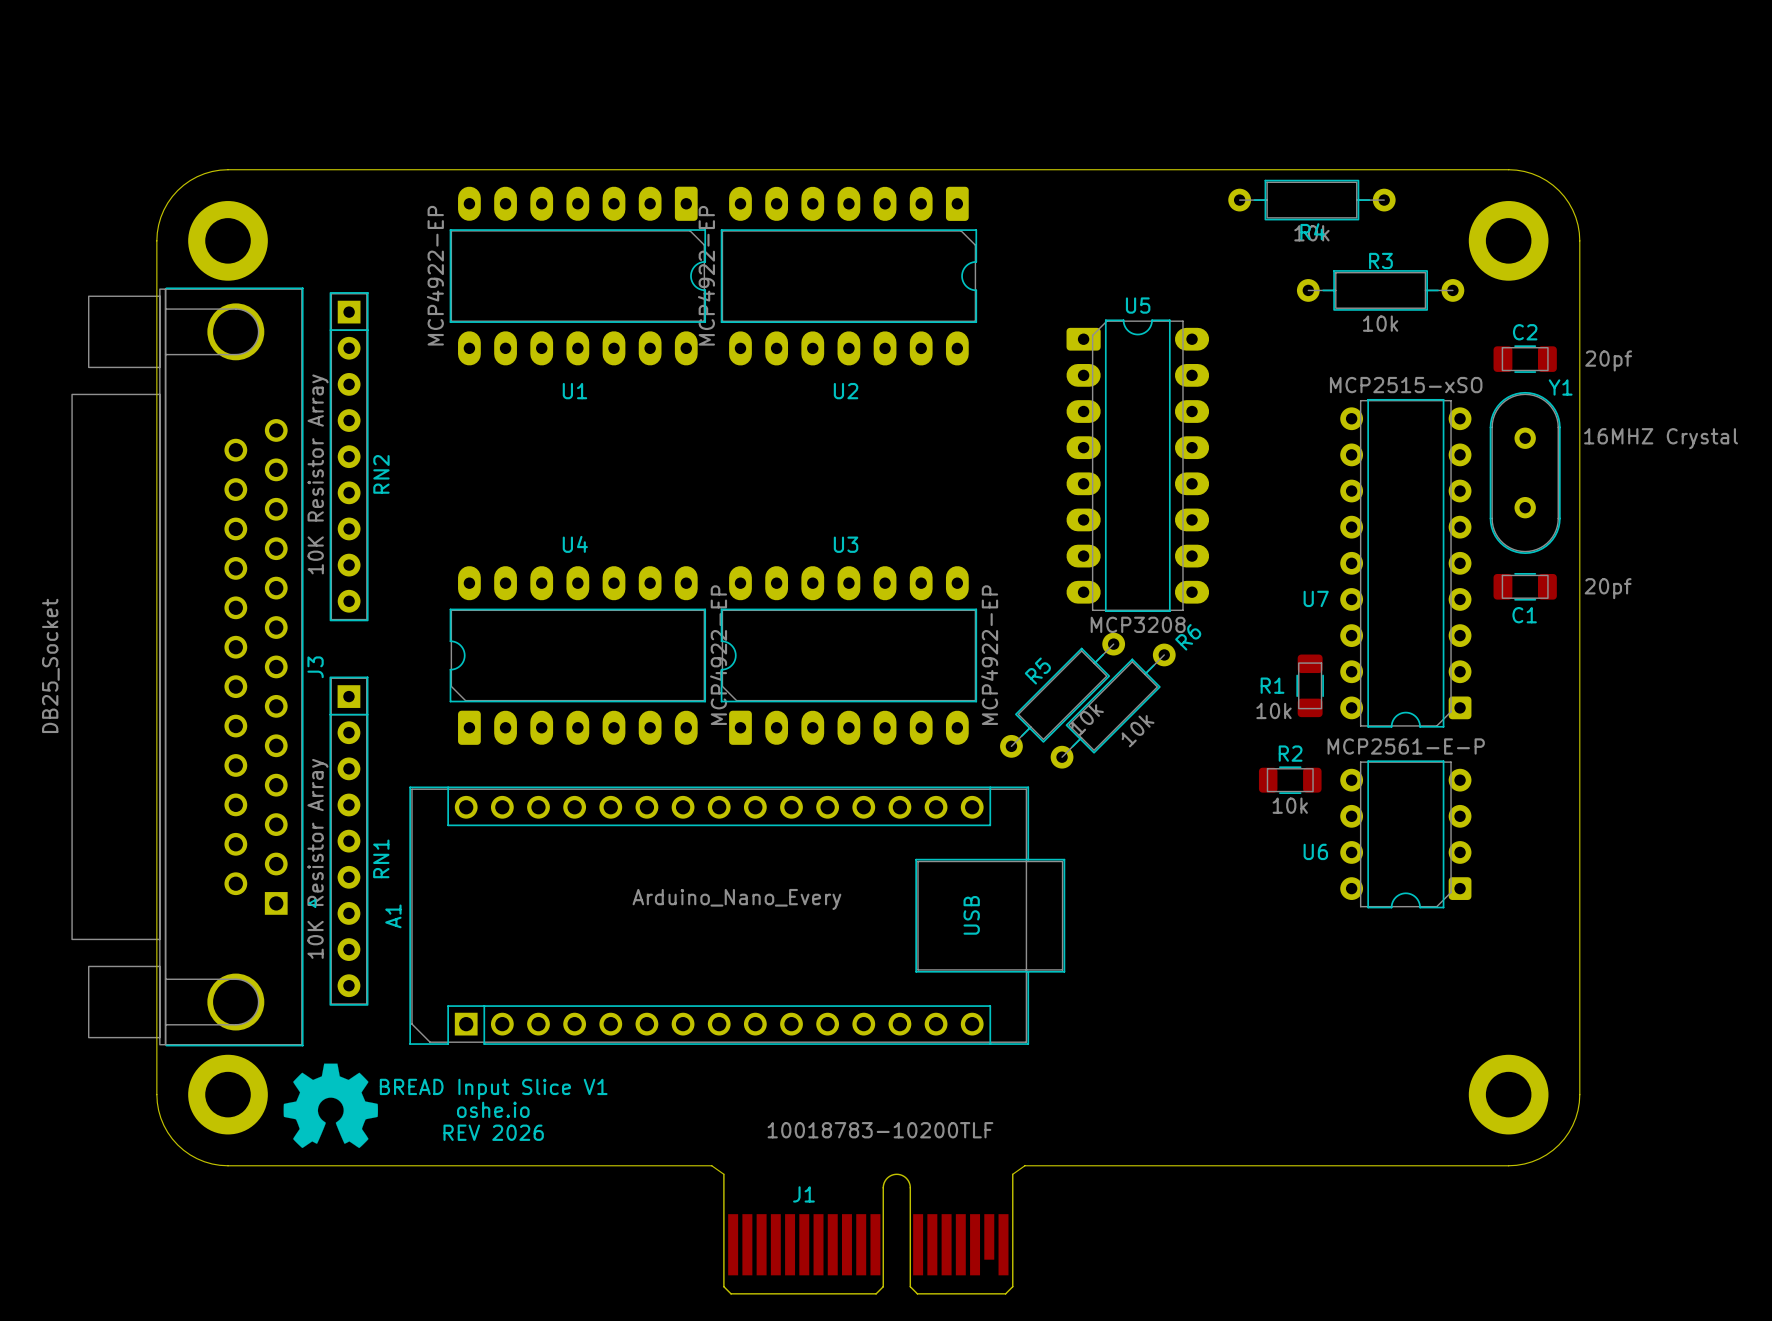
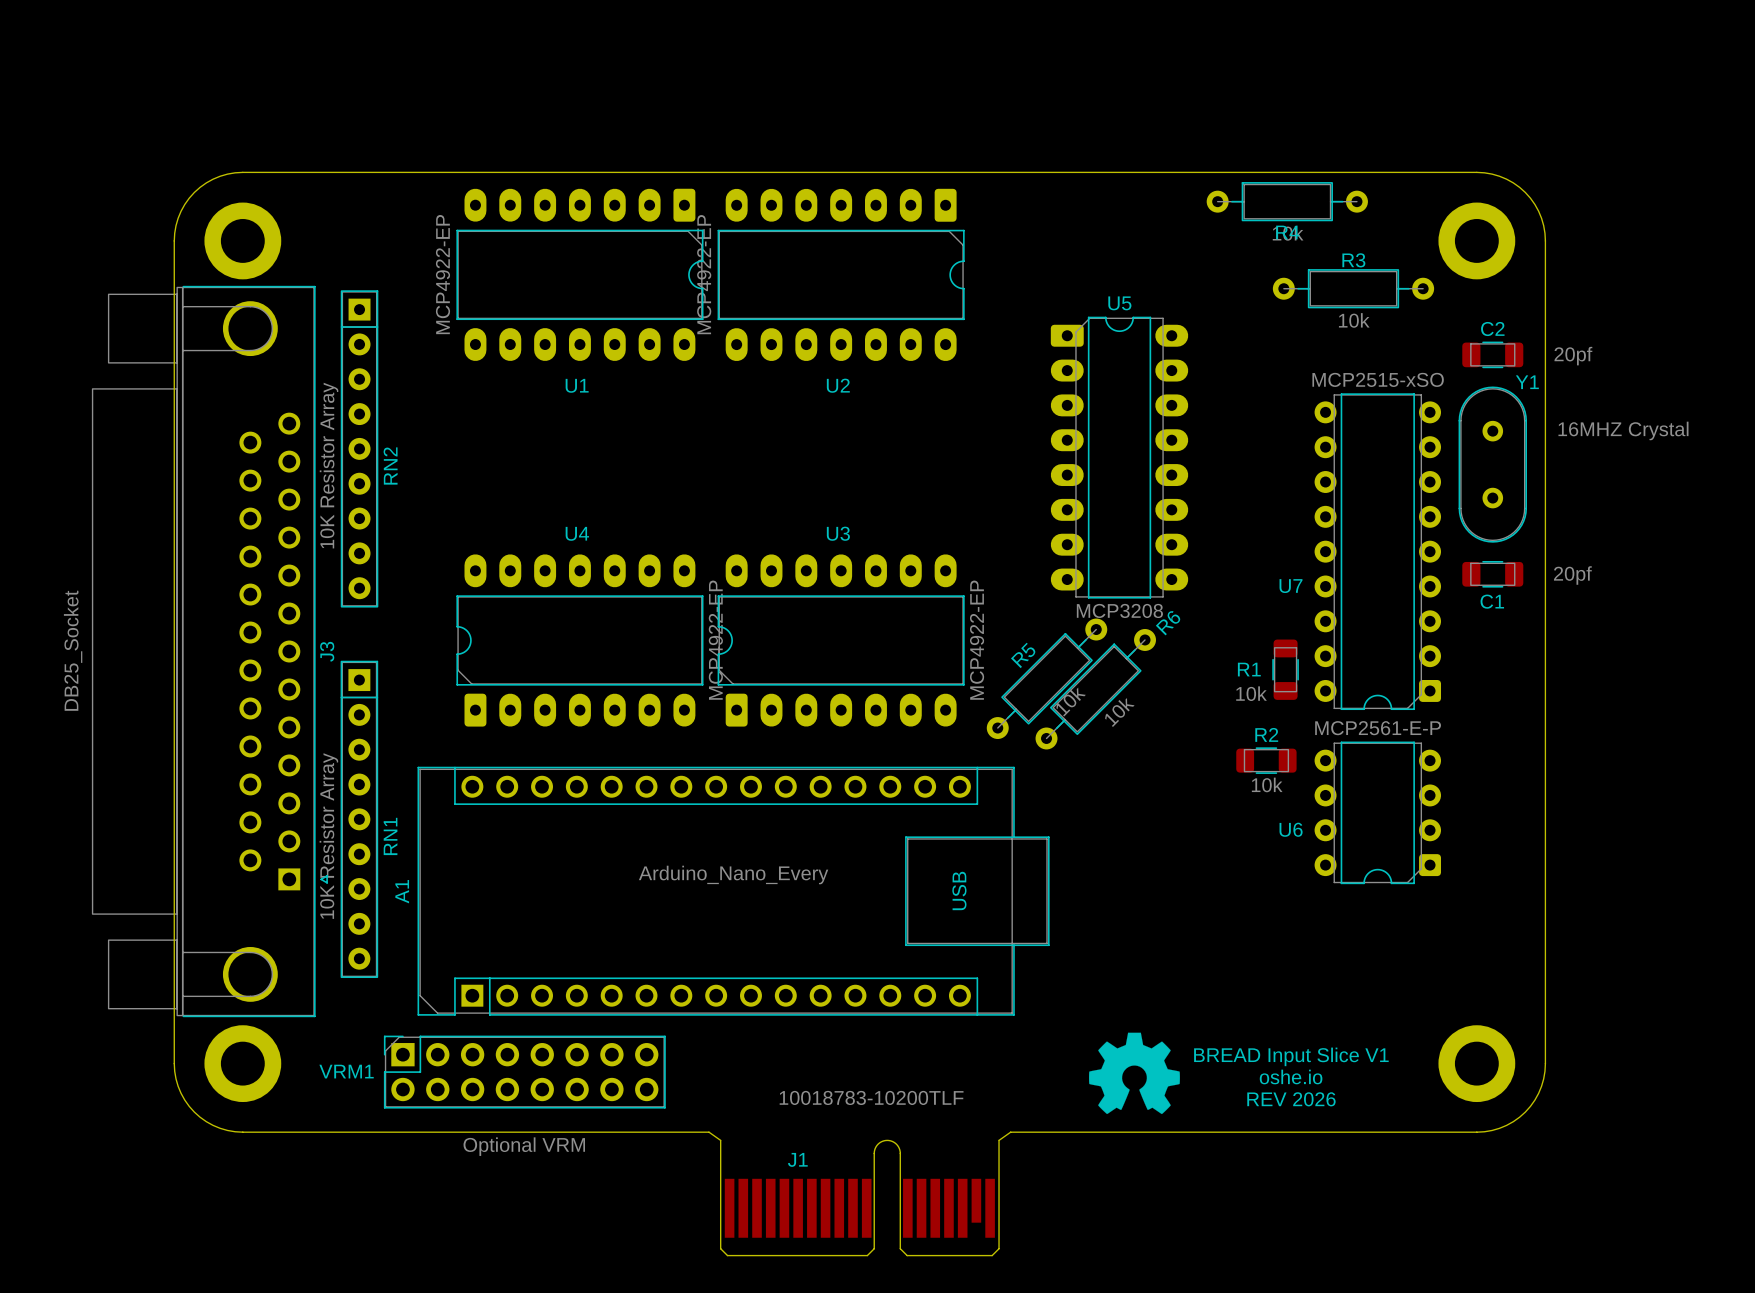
drawing: none -> [1089, 1032, 1180, 1115]
drawing: [283, 1063, 379, 1149] -> none
text: none -> BREAD Input Slice V1 (1291, 1056)
text: BREAD Input Slice V1 (493, 1089) -> none
VRM1: none -> Optional VRM (524, 1072)
text: none -> oshe.io (1291, 1076)
text: oshe.io (493, 1109) -> none
text: none -> REV 2026 (1291, 1099)
text: REV 2026 (493, 1132) -> none

